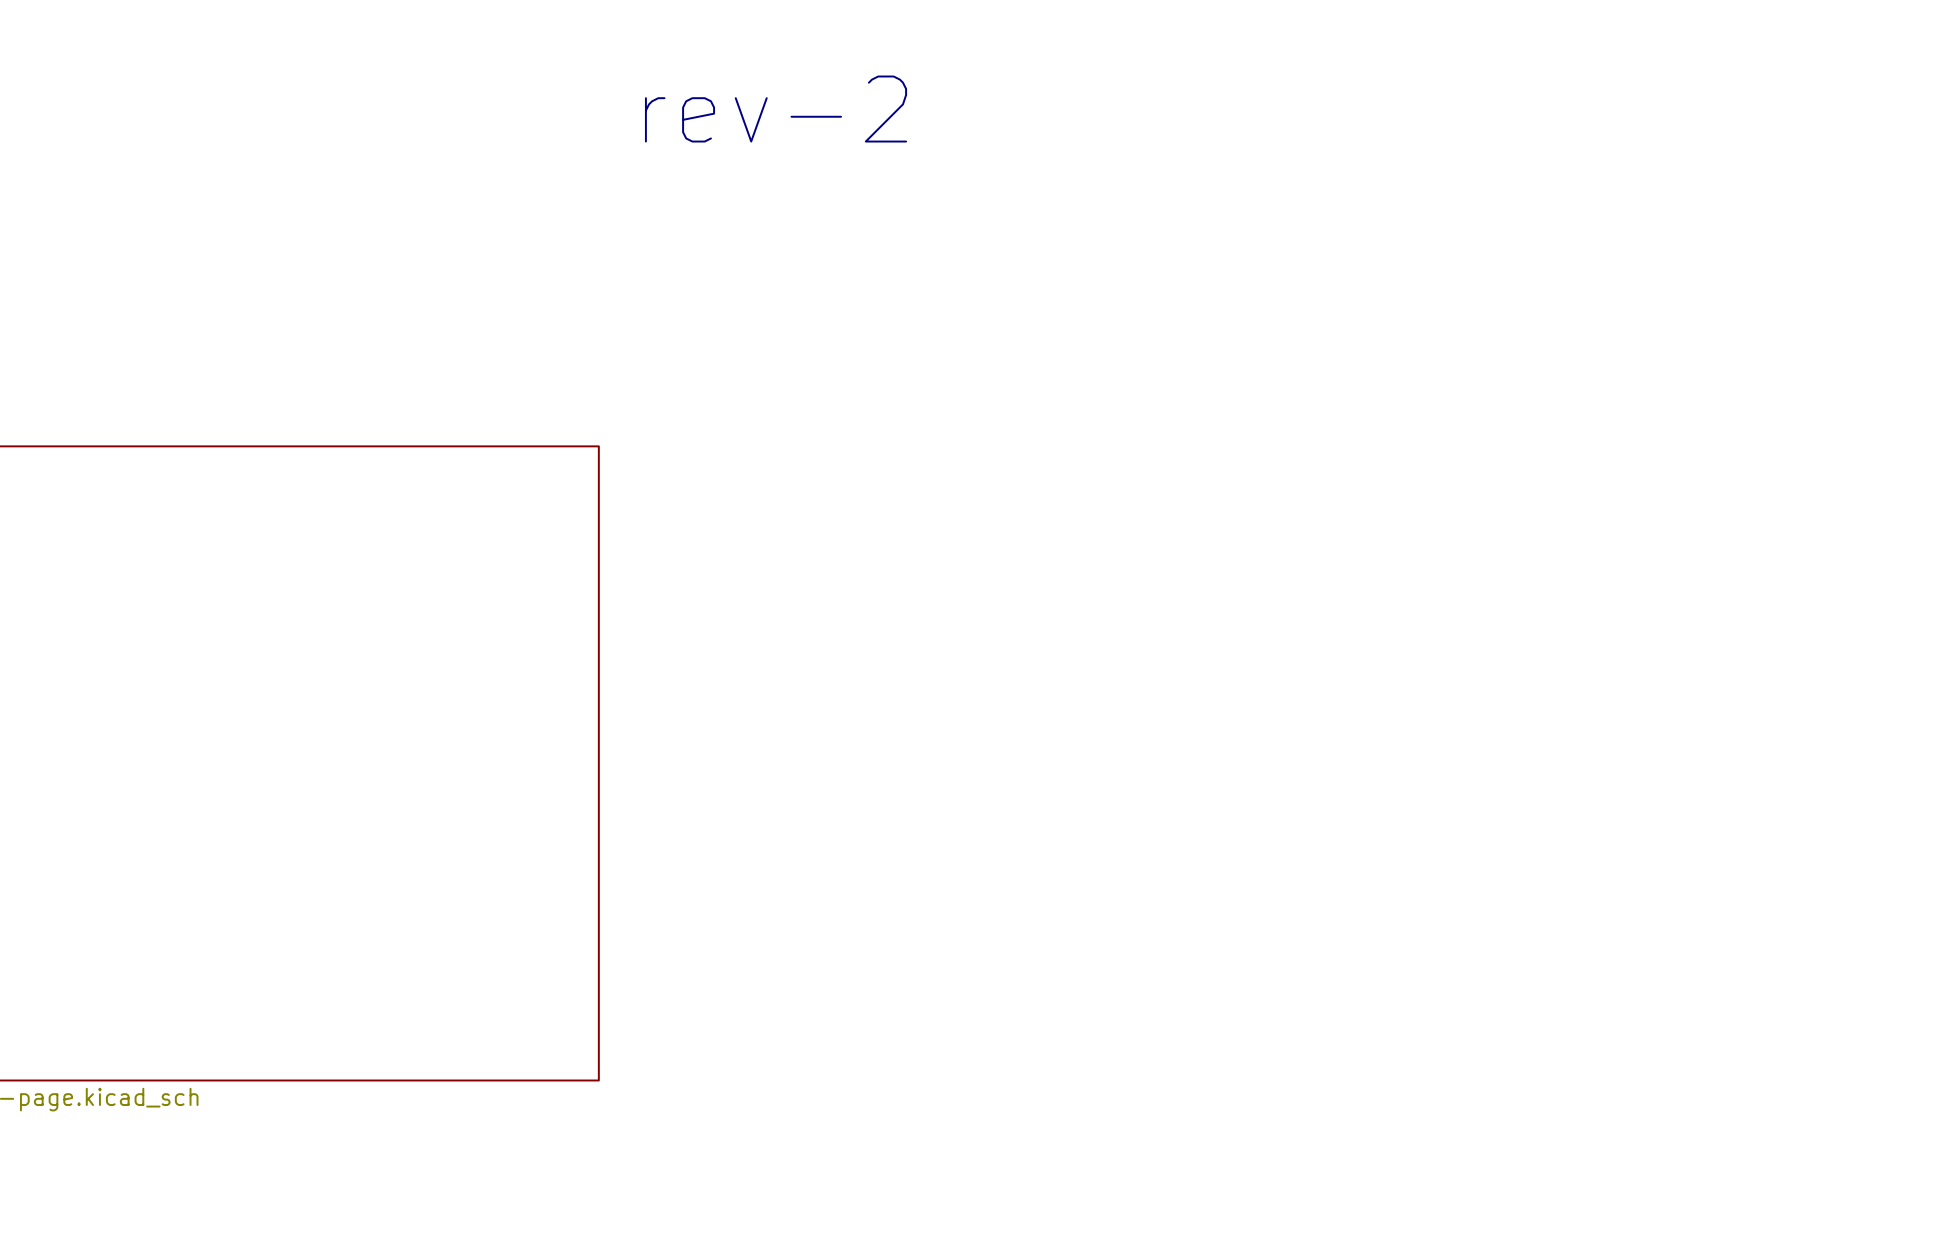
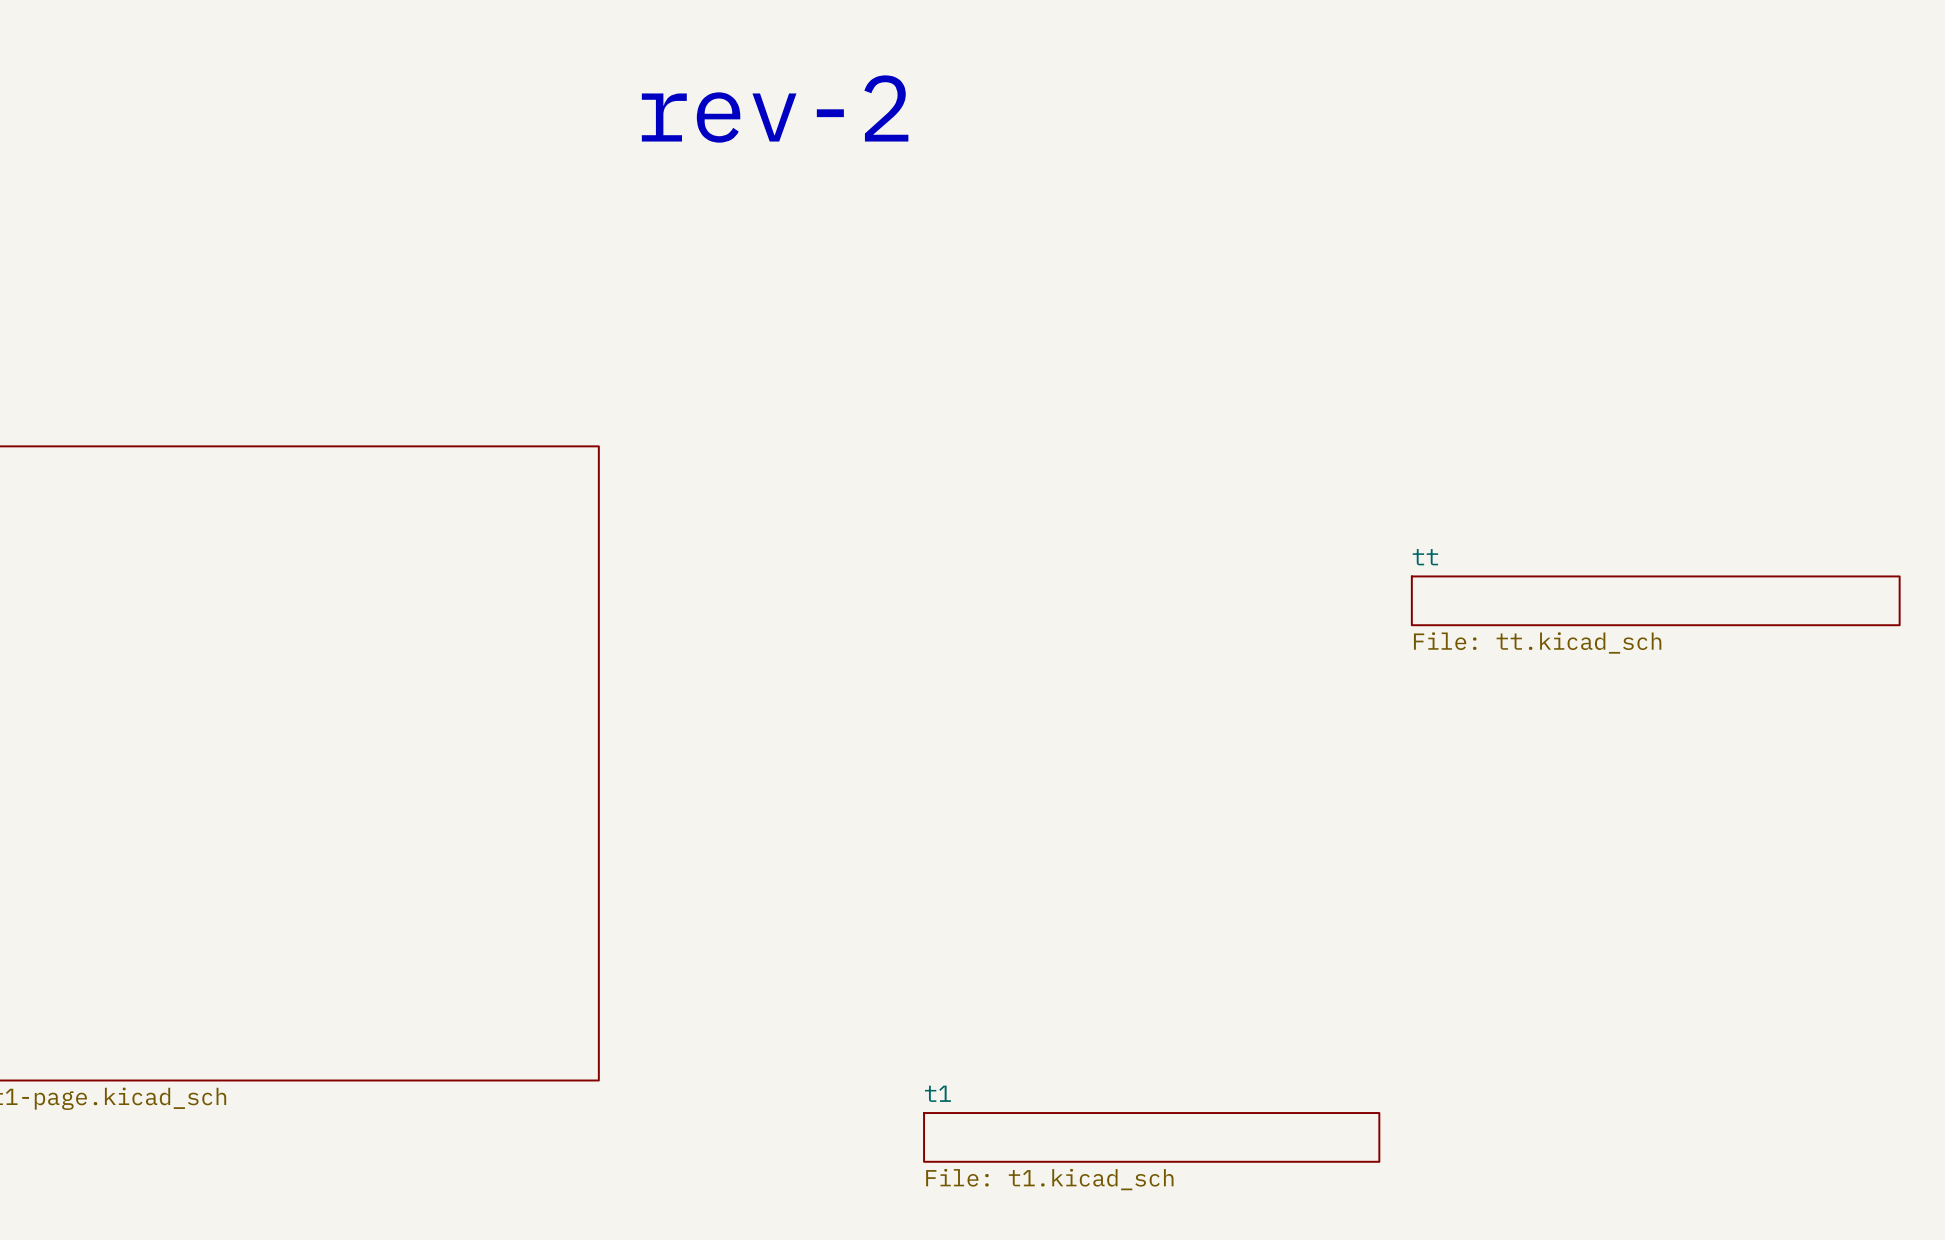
sheet tt: none -> File: tt.kicad_sch (1655, 600)
sheet t1: none -> File: t1.kicad_sch (1151, 1137)

